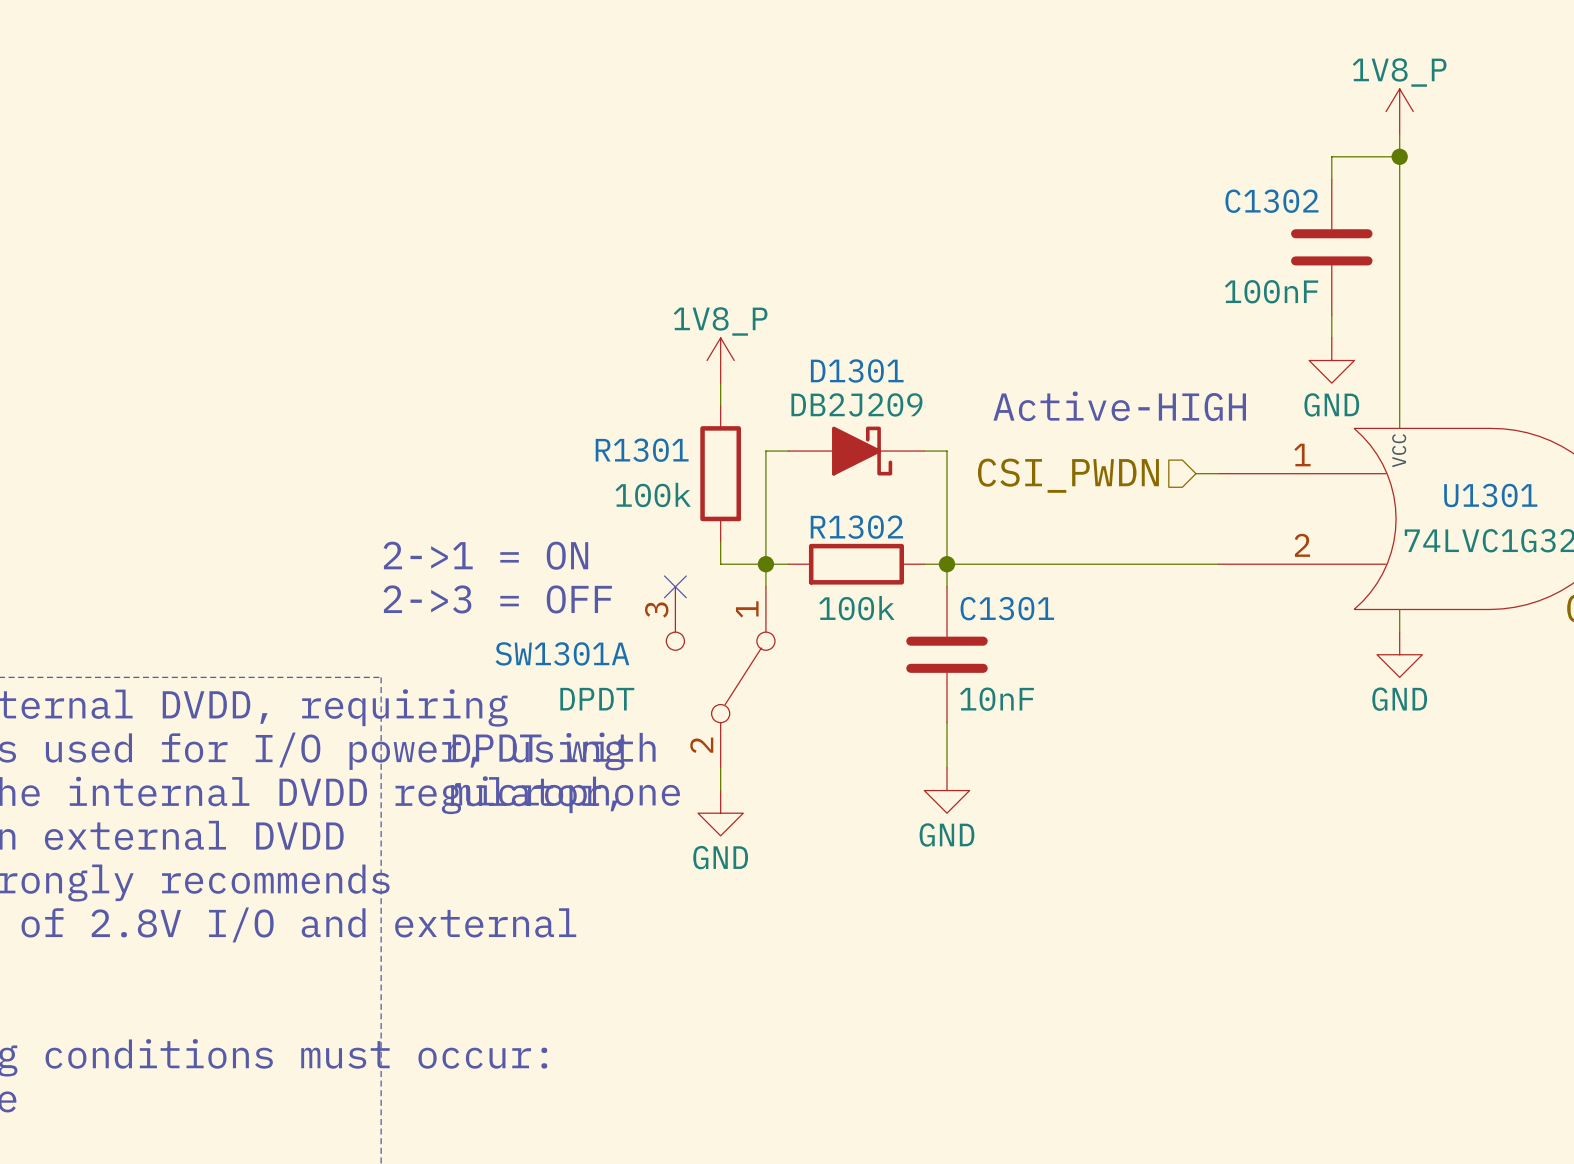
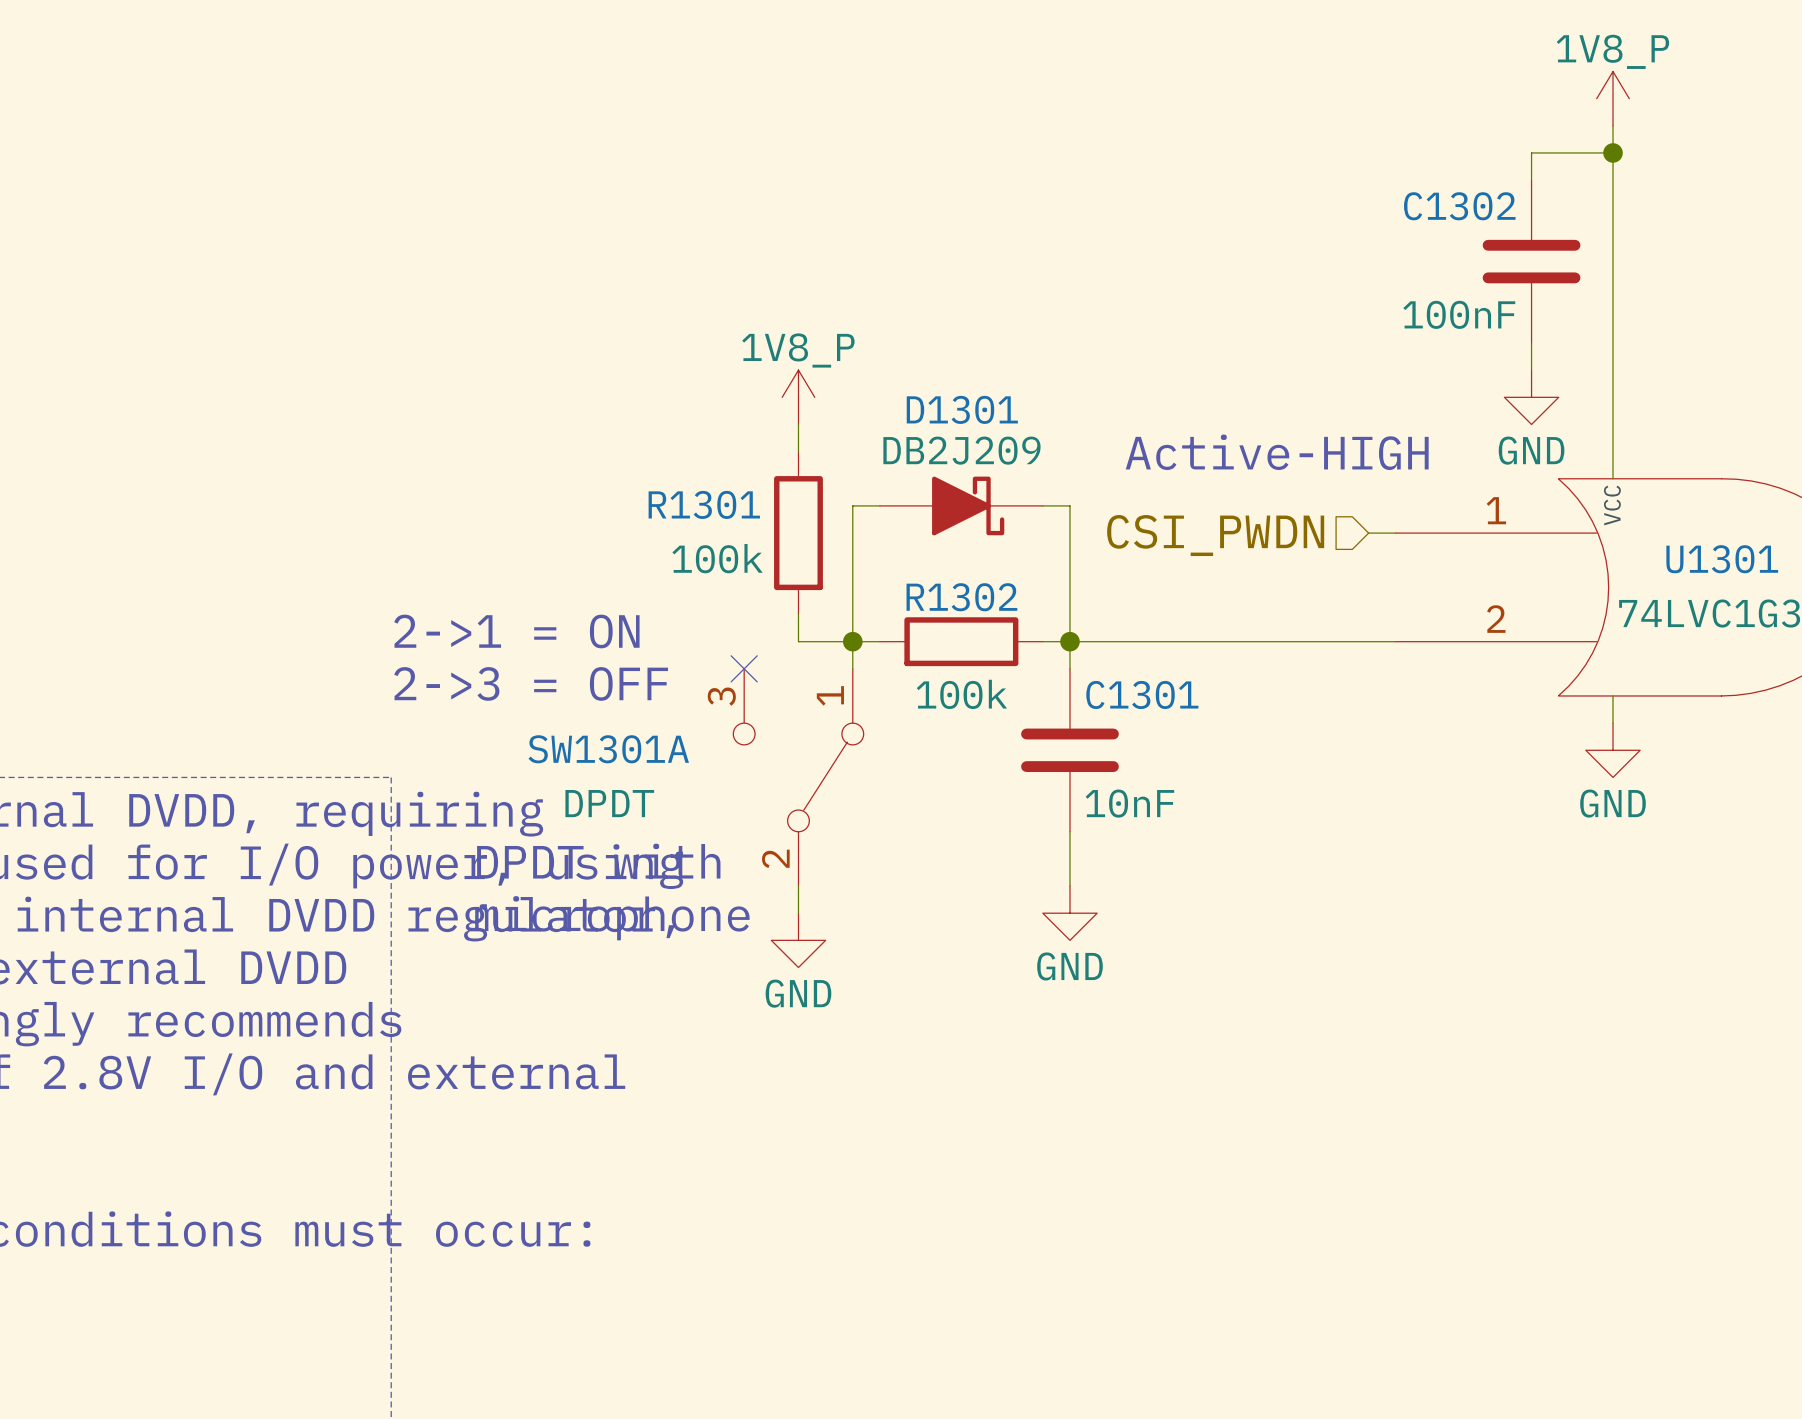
SW1301A value position: DPDT (597, 699) -> DPDT (609, 803)

